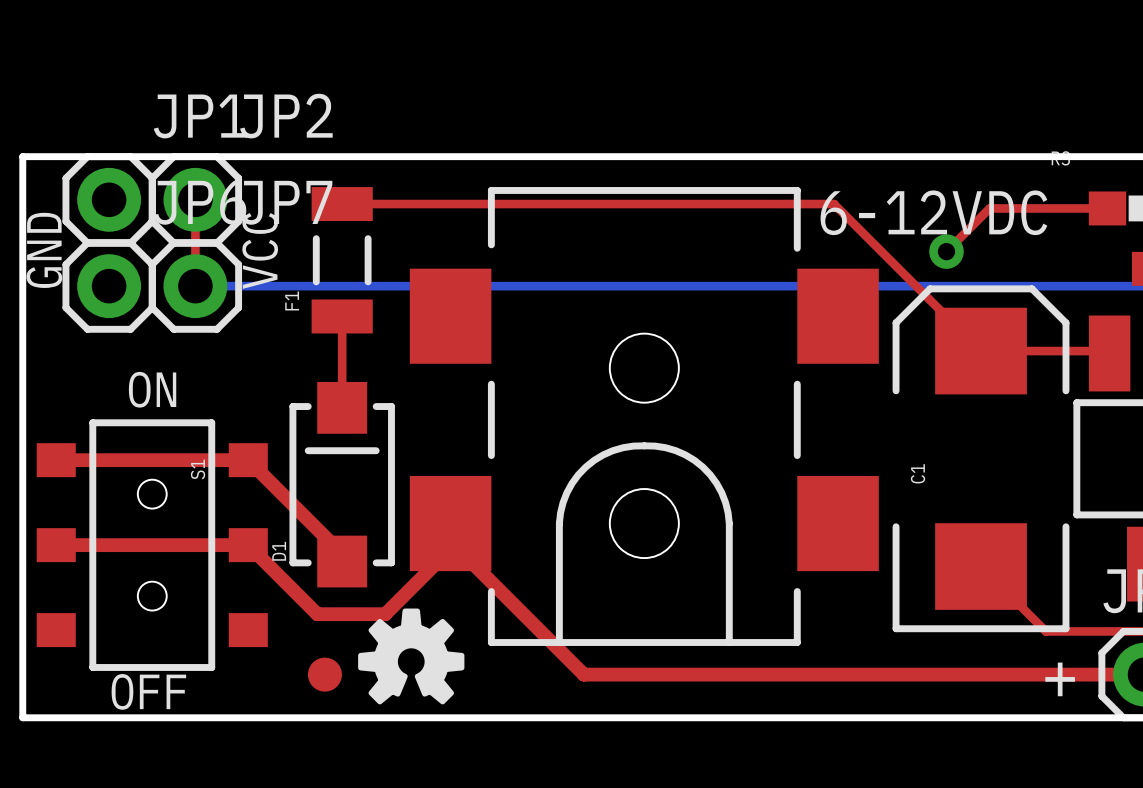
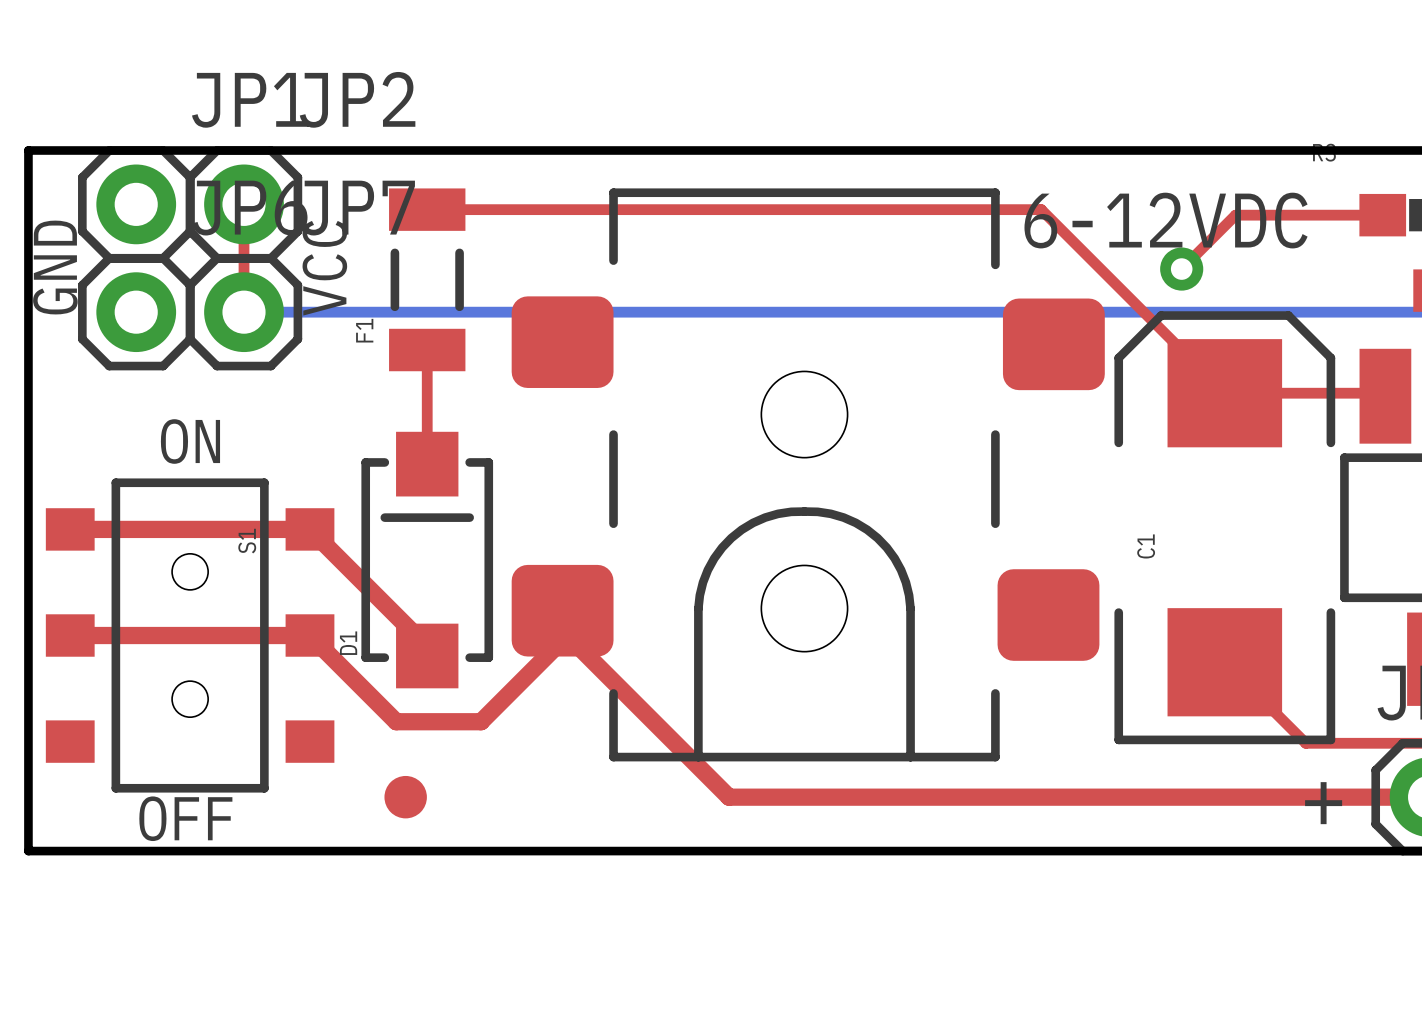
part footprint: [409, 187, 879, 646] -> [511, 188, 1105, 762]
drawing: [358, 608, 465, 705] -> none

